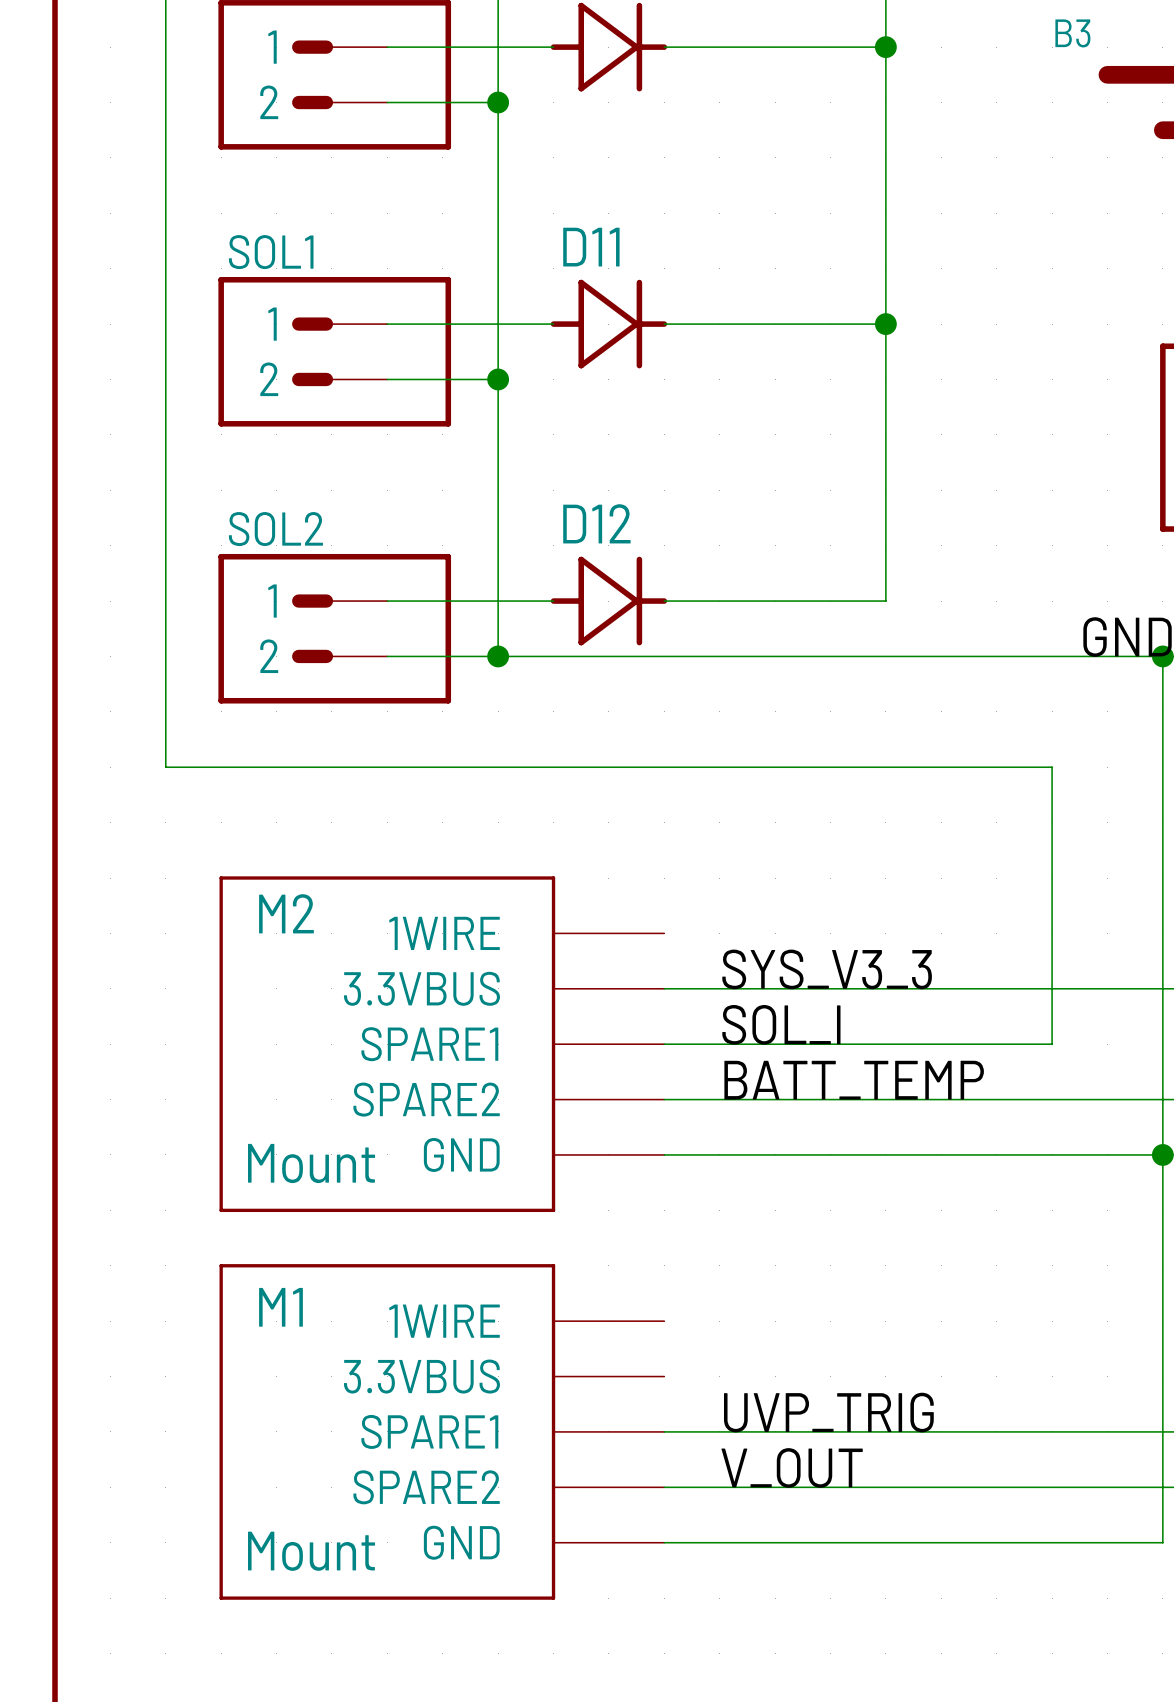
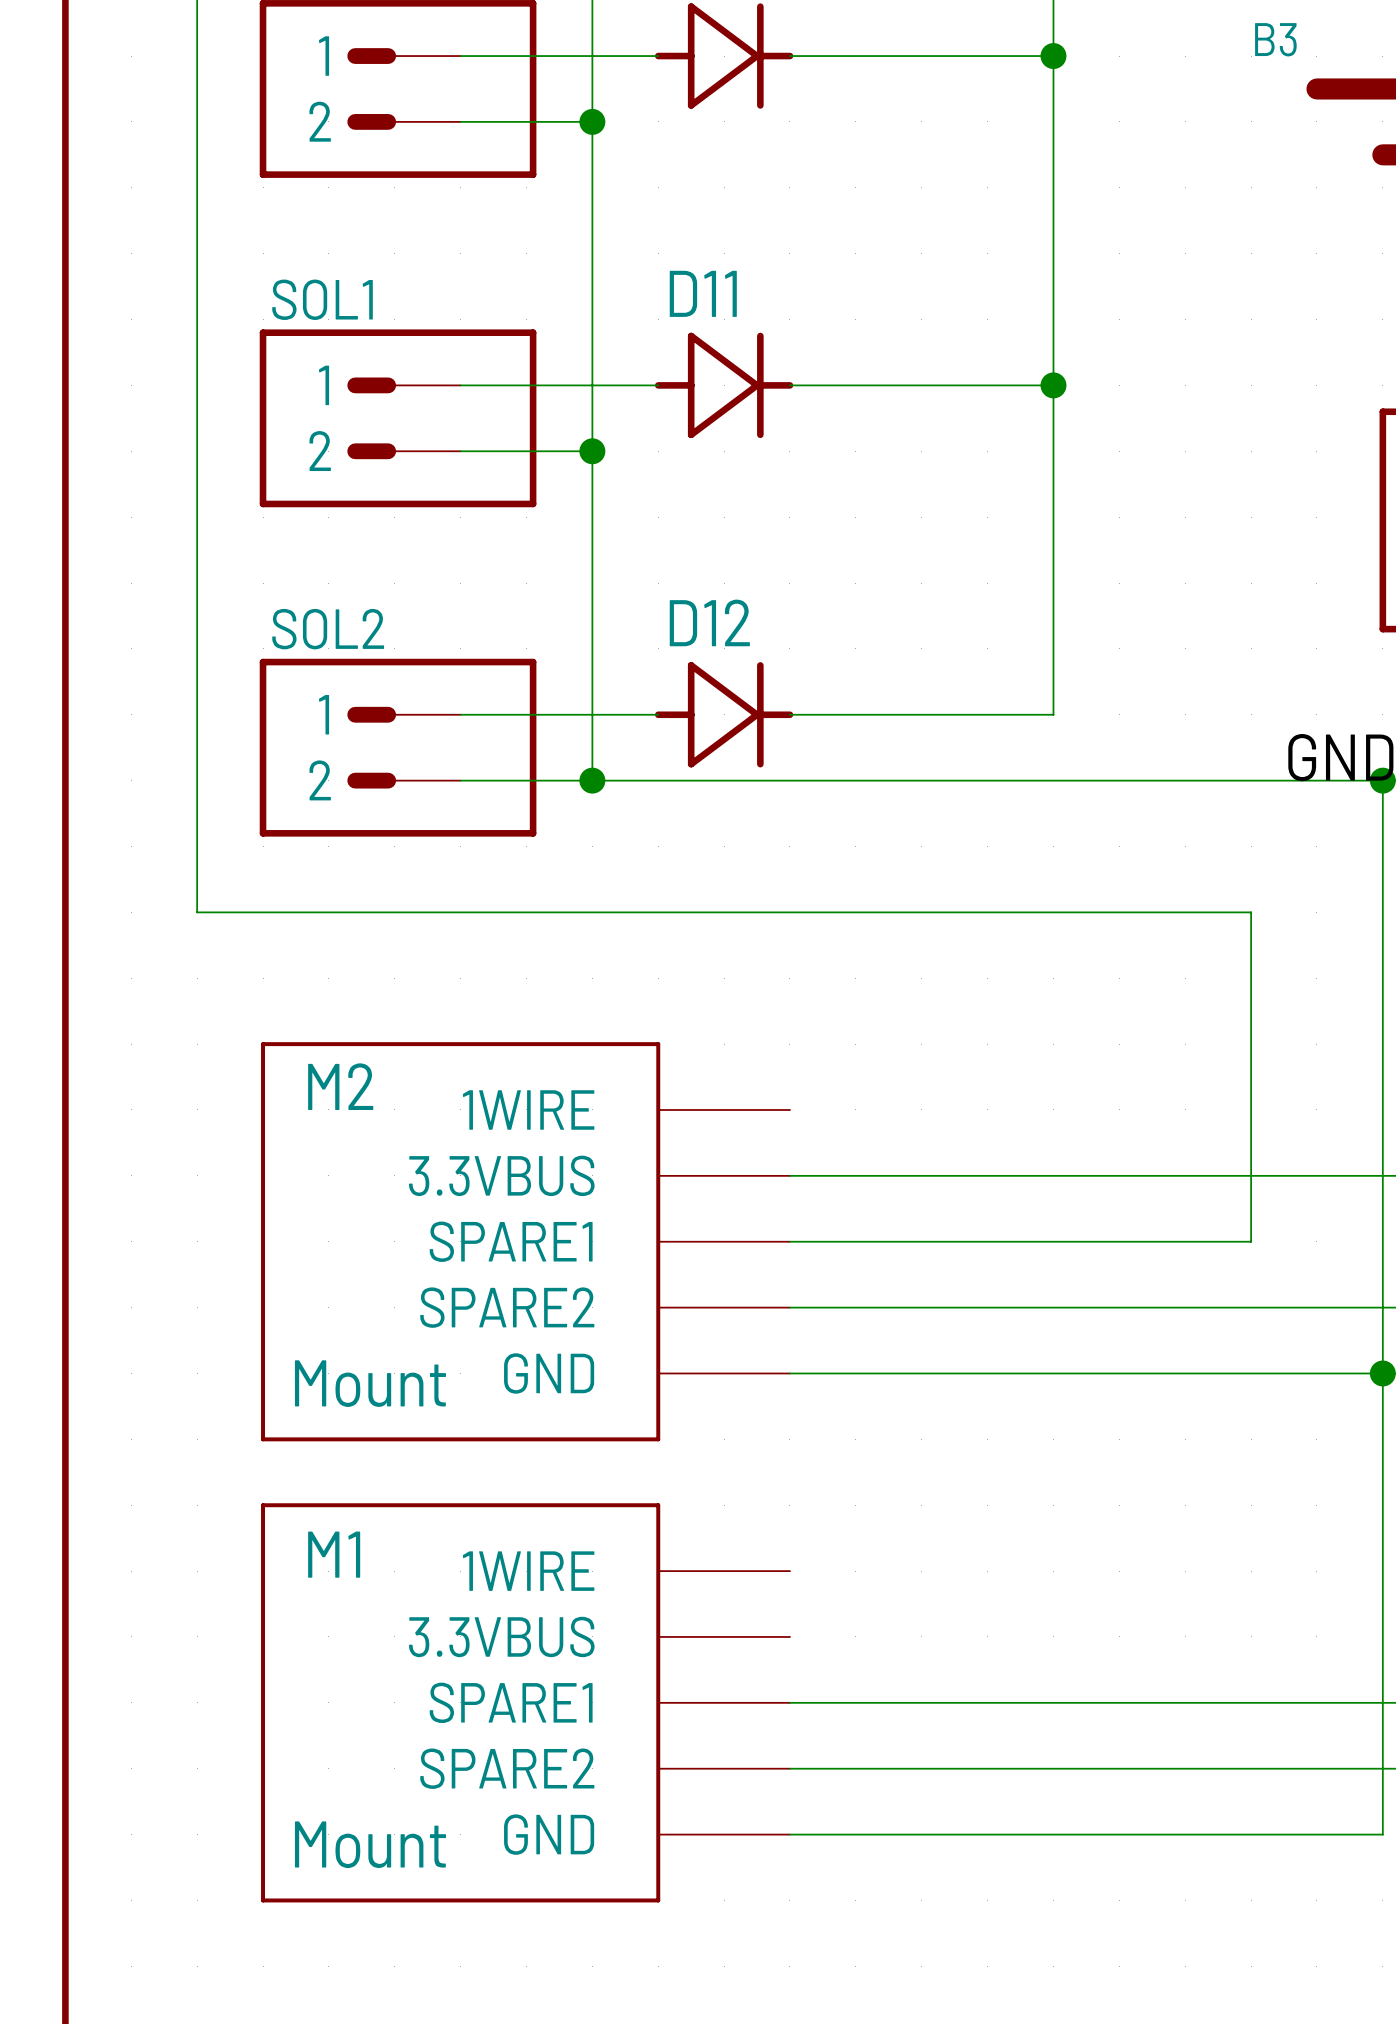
label: SYS_V3_3 (827, 969) -> none
label: SOL_I (781, 1024) -> none
label: BATT_TEMP (854, 1080) -> none
label: UVP_TRIG (828, 1412) -> none
label: V_OUT (792, 1467) -> none

